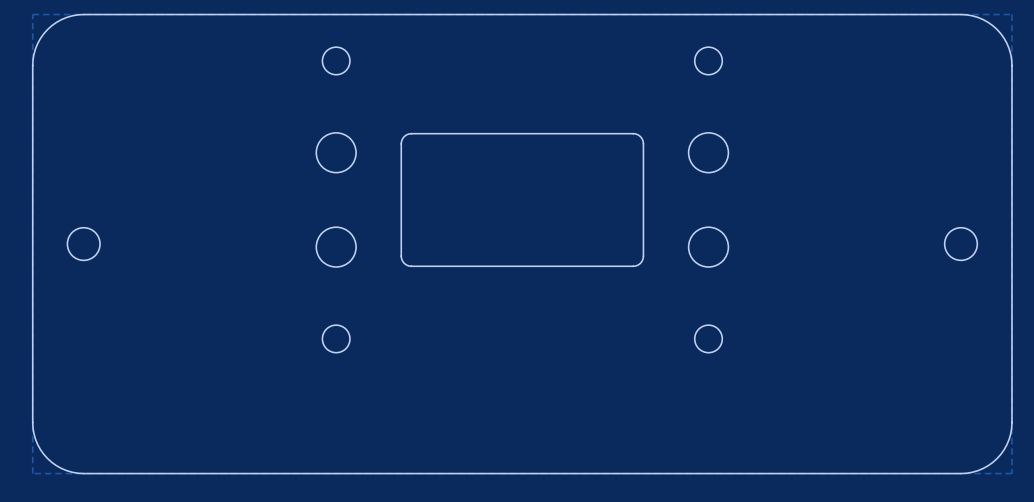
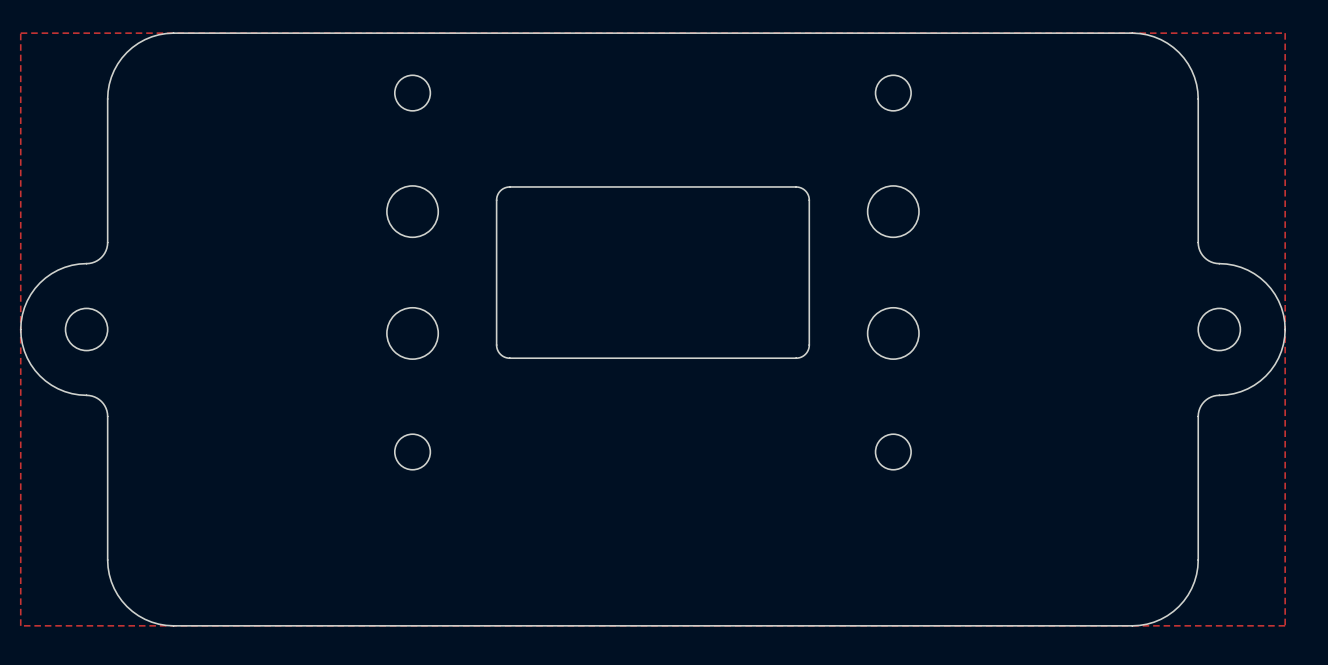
board edge: (151, 14) (78, 14) (61, 19) (47, 29) (40, 38) (33, 54) (32, 65) (32, 422) (35, 439) (47, 458) (66, 470) (83, 473) (151, 473) -> (173, 33) (151, 36) (132, 47) (122, 57) (111, 77) (107, 99) (107, 242) (104, 253) (94, 262) (71, 265) (58, 270) (40, 282) (27, 300) (22, 314) (20, 329) (24, 351) (30, 364) (40, 376) (58, 388) (71, 393) (94, 396) (104, 405) (107, 416) (107, 559) (111, 581) (122, 601) (132, 611) (151, 622) (173, 625)
board edge: (893, 14) (966, 14) (983, 19) (997, 29) (1004, 38) (1010, 54) (1011, 65) (1011, 422) (1009, 439) (997, 458) (977, 470) (960, 473) (893, 473) -> (1132, 33) (1154, 36) (1173, 47) (1183, 57) (1194, 77) (1198, 99) (1198, 242) (1201, 253) (1211, 262) (1233, 265) (1247, 270) (1265, 282) (1278, 300) (1283, 314) (1285, 329) (1283, 344) (1278, 358) (1265, 376) (1247, 388) (1233, 393) (1211, 396) (1201, 405) (1198, 416) (1198, 559) (1194, 581) (1183, 601) (1173, 611) (1154, 622) (1132, 625)

